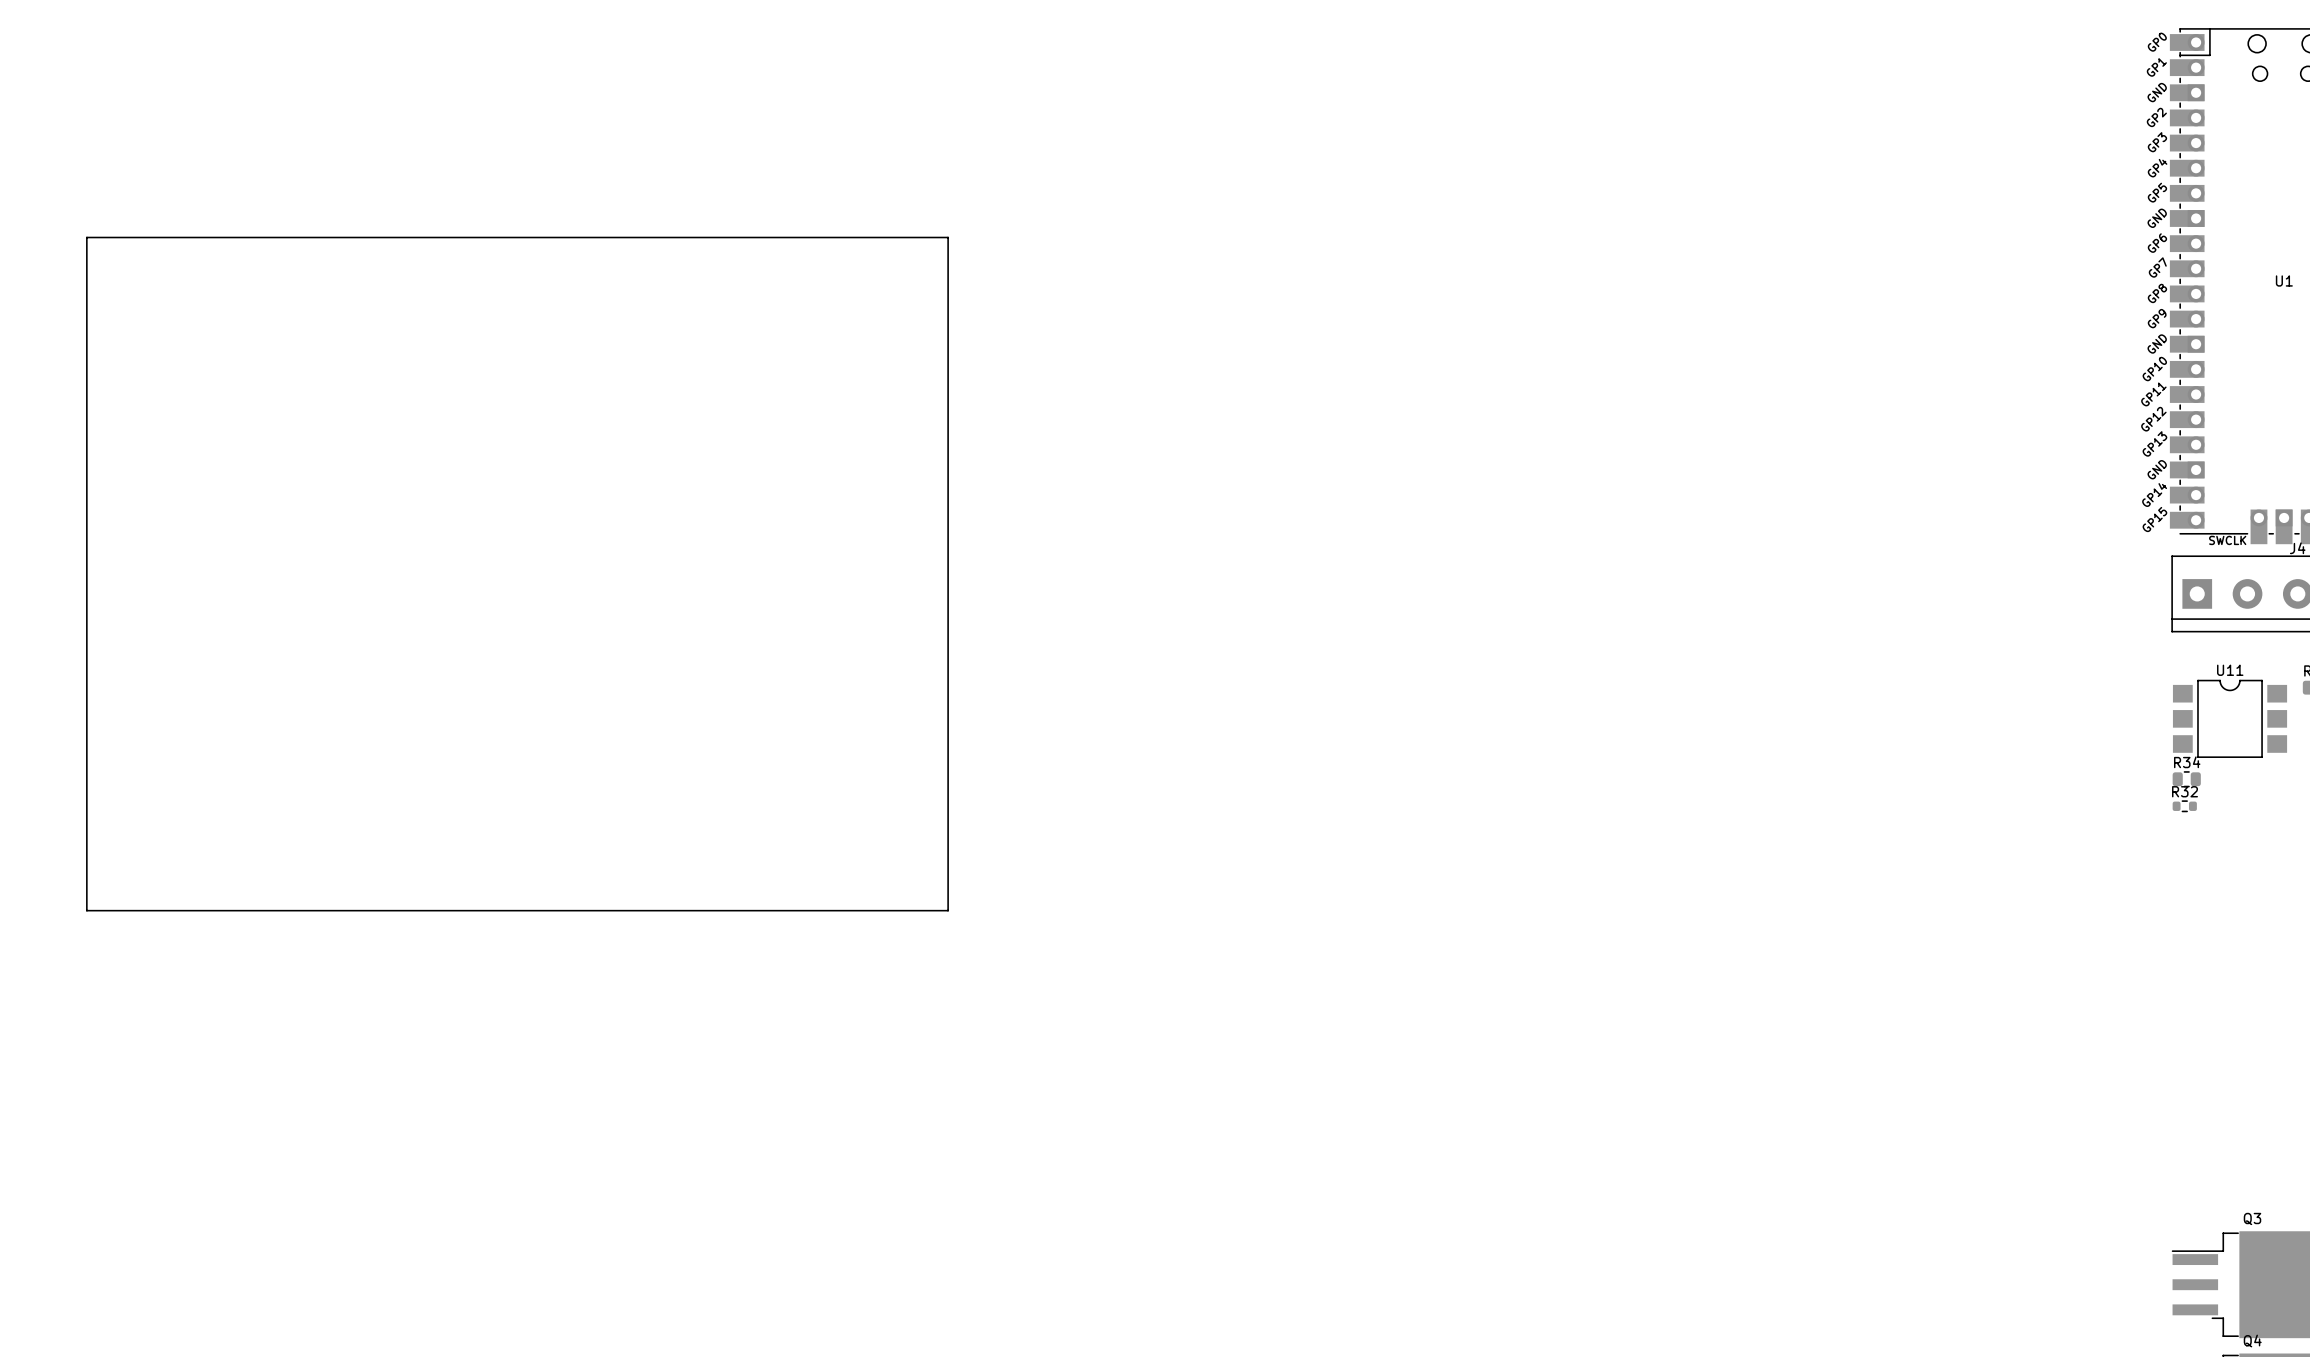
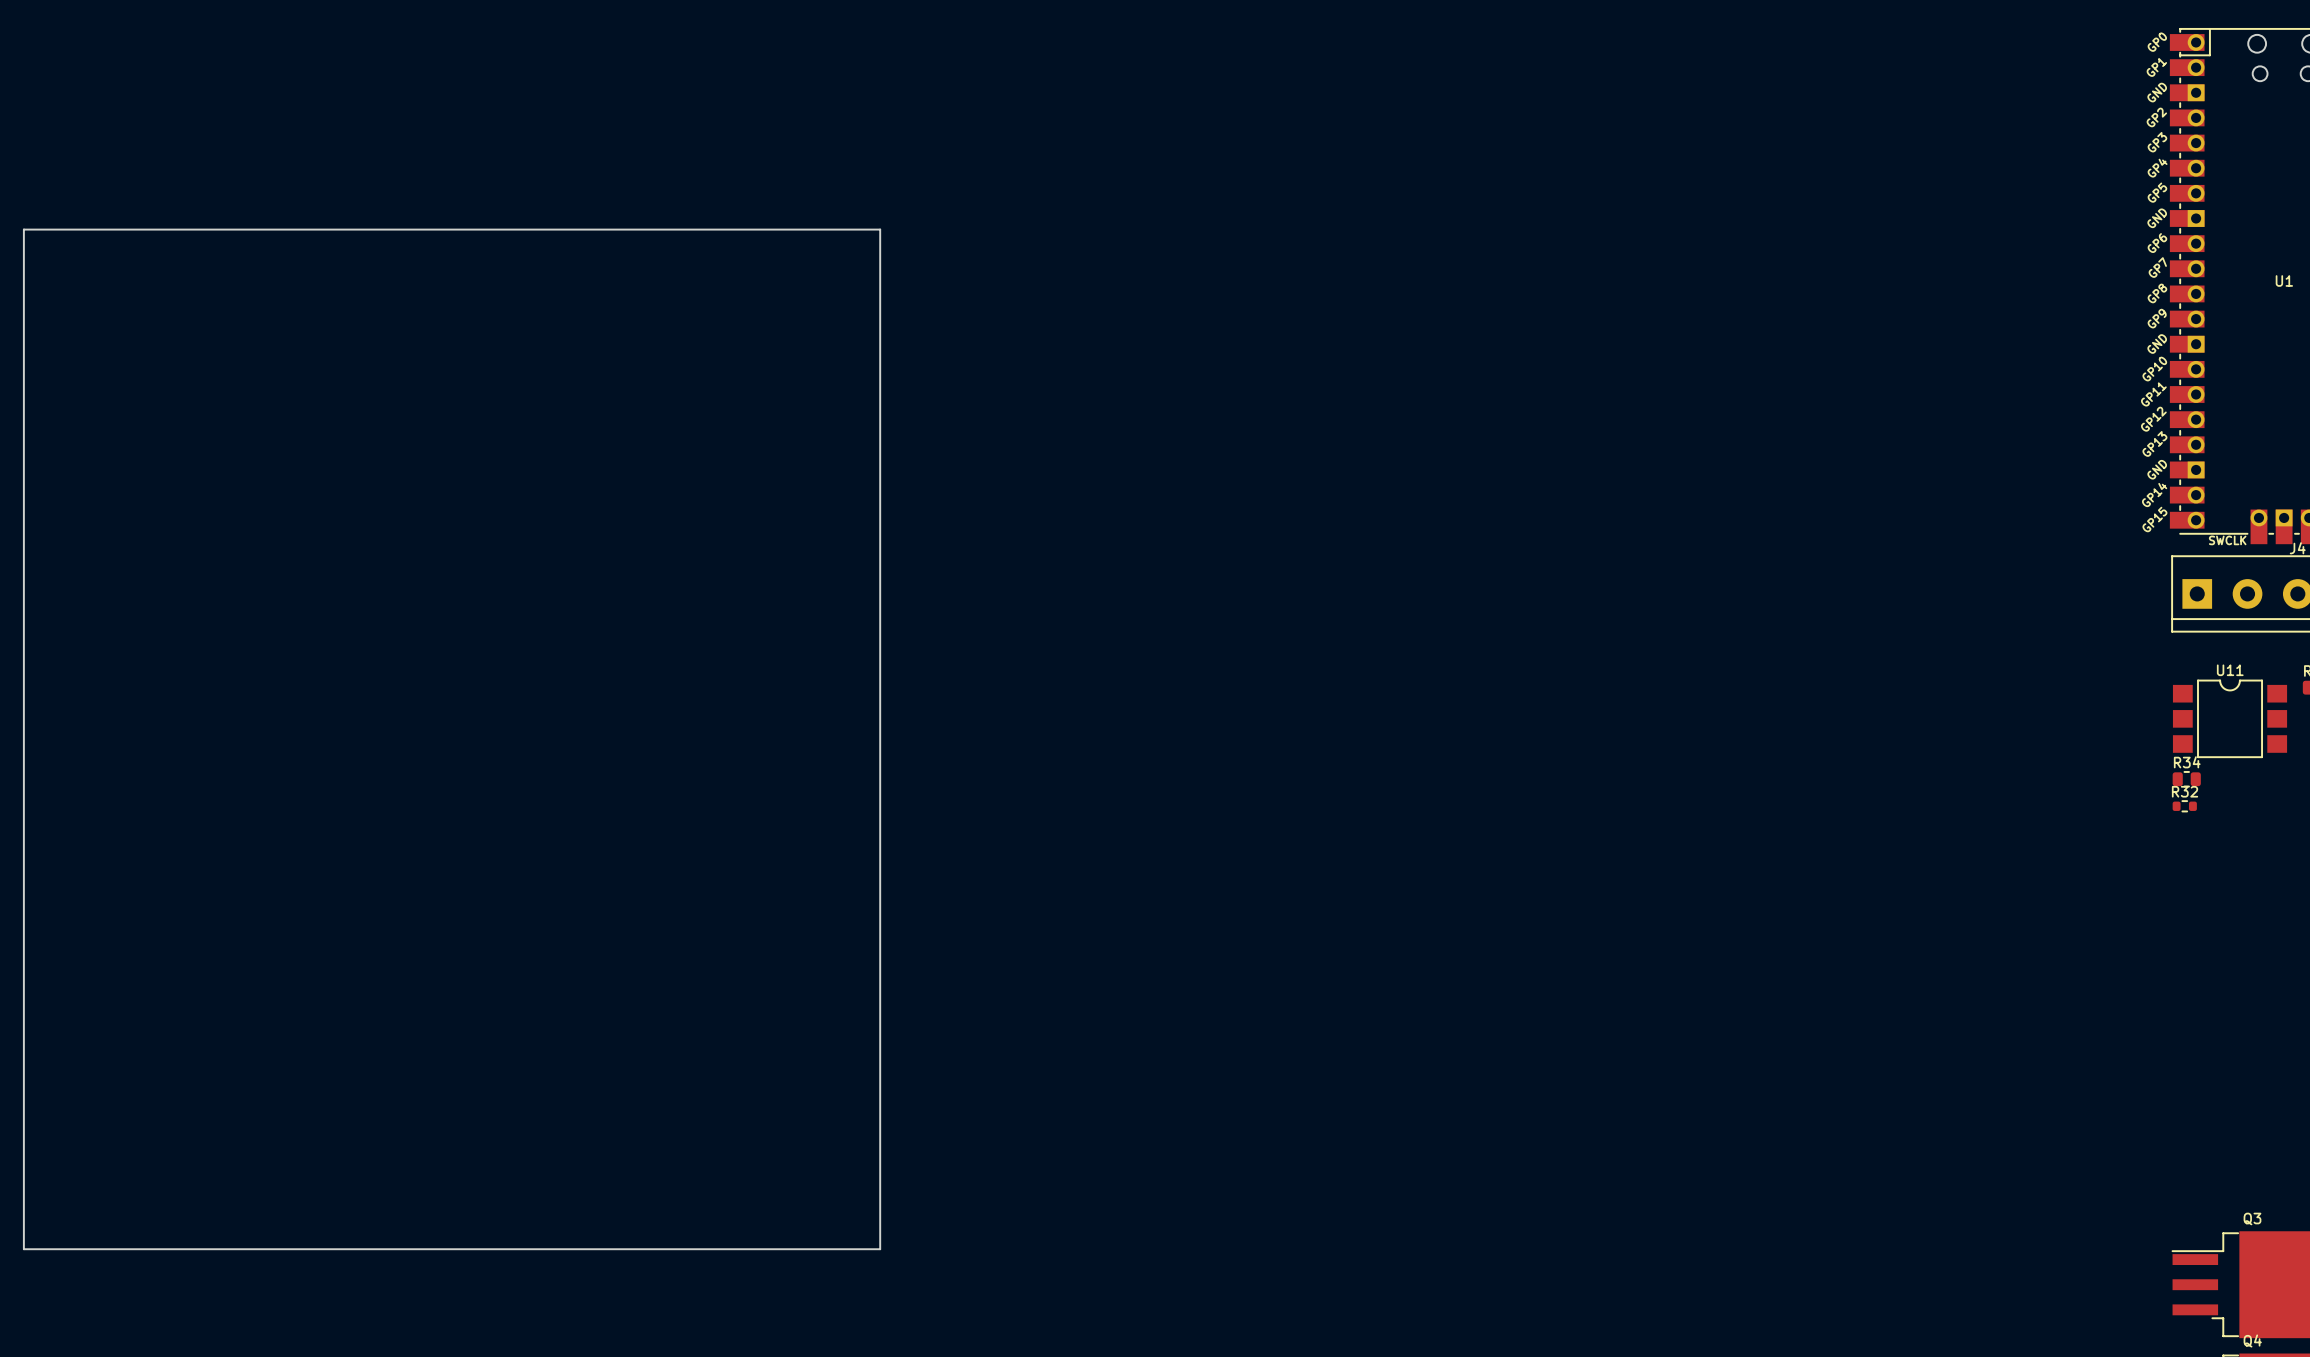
board edge: (86, 237) (948, 237) (948, 910) (86, 910) (86, 237) -> (23, 229) (23, 1249) (880, 1249) (880, 229) (23, 229)

